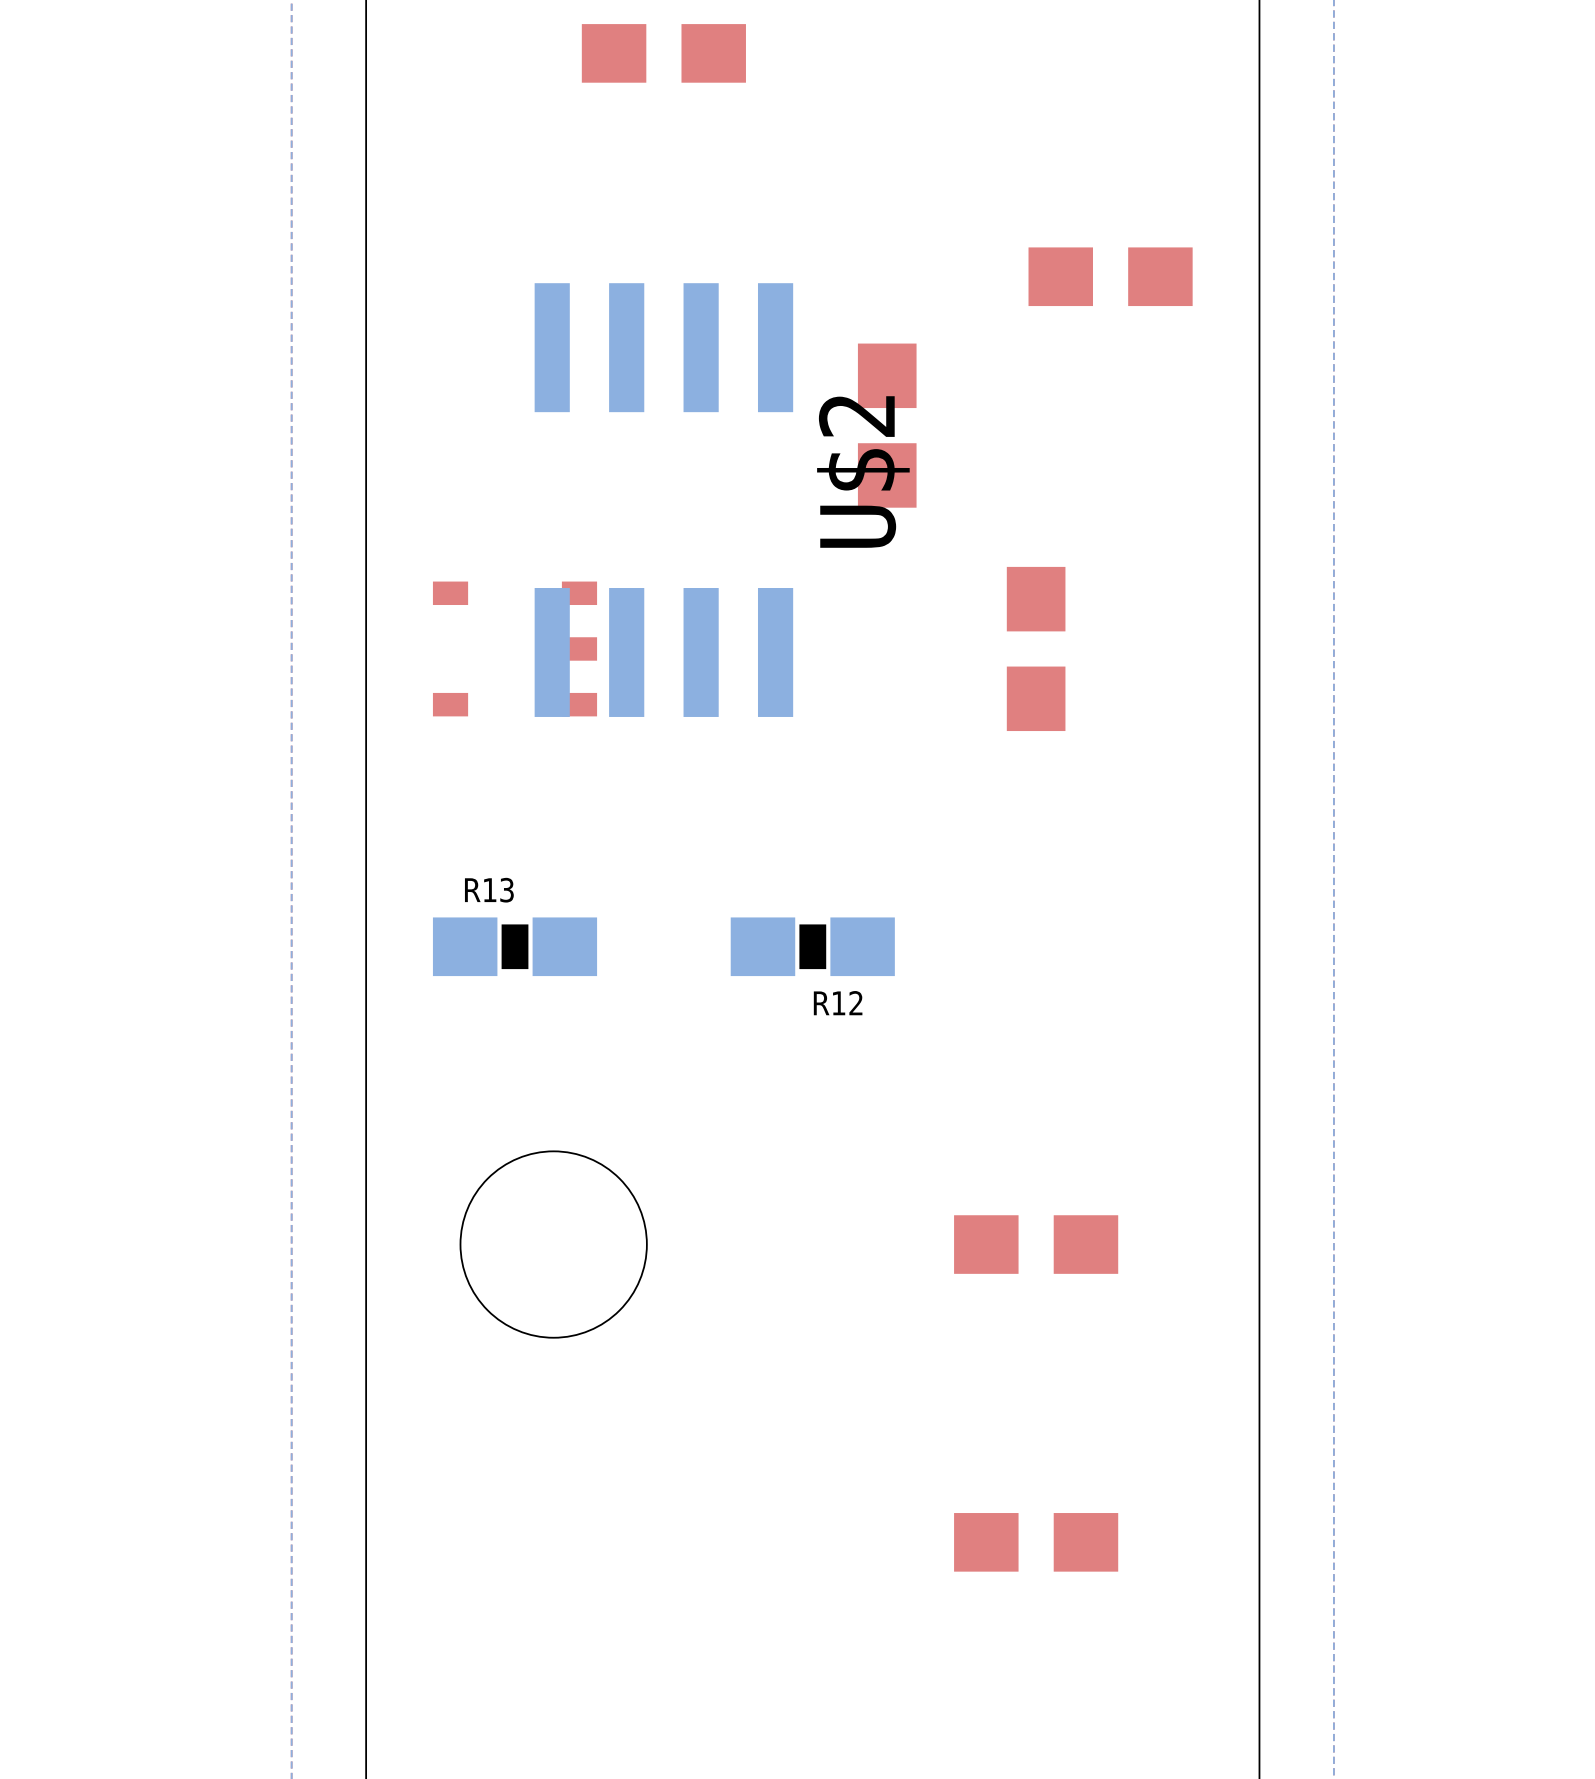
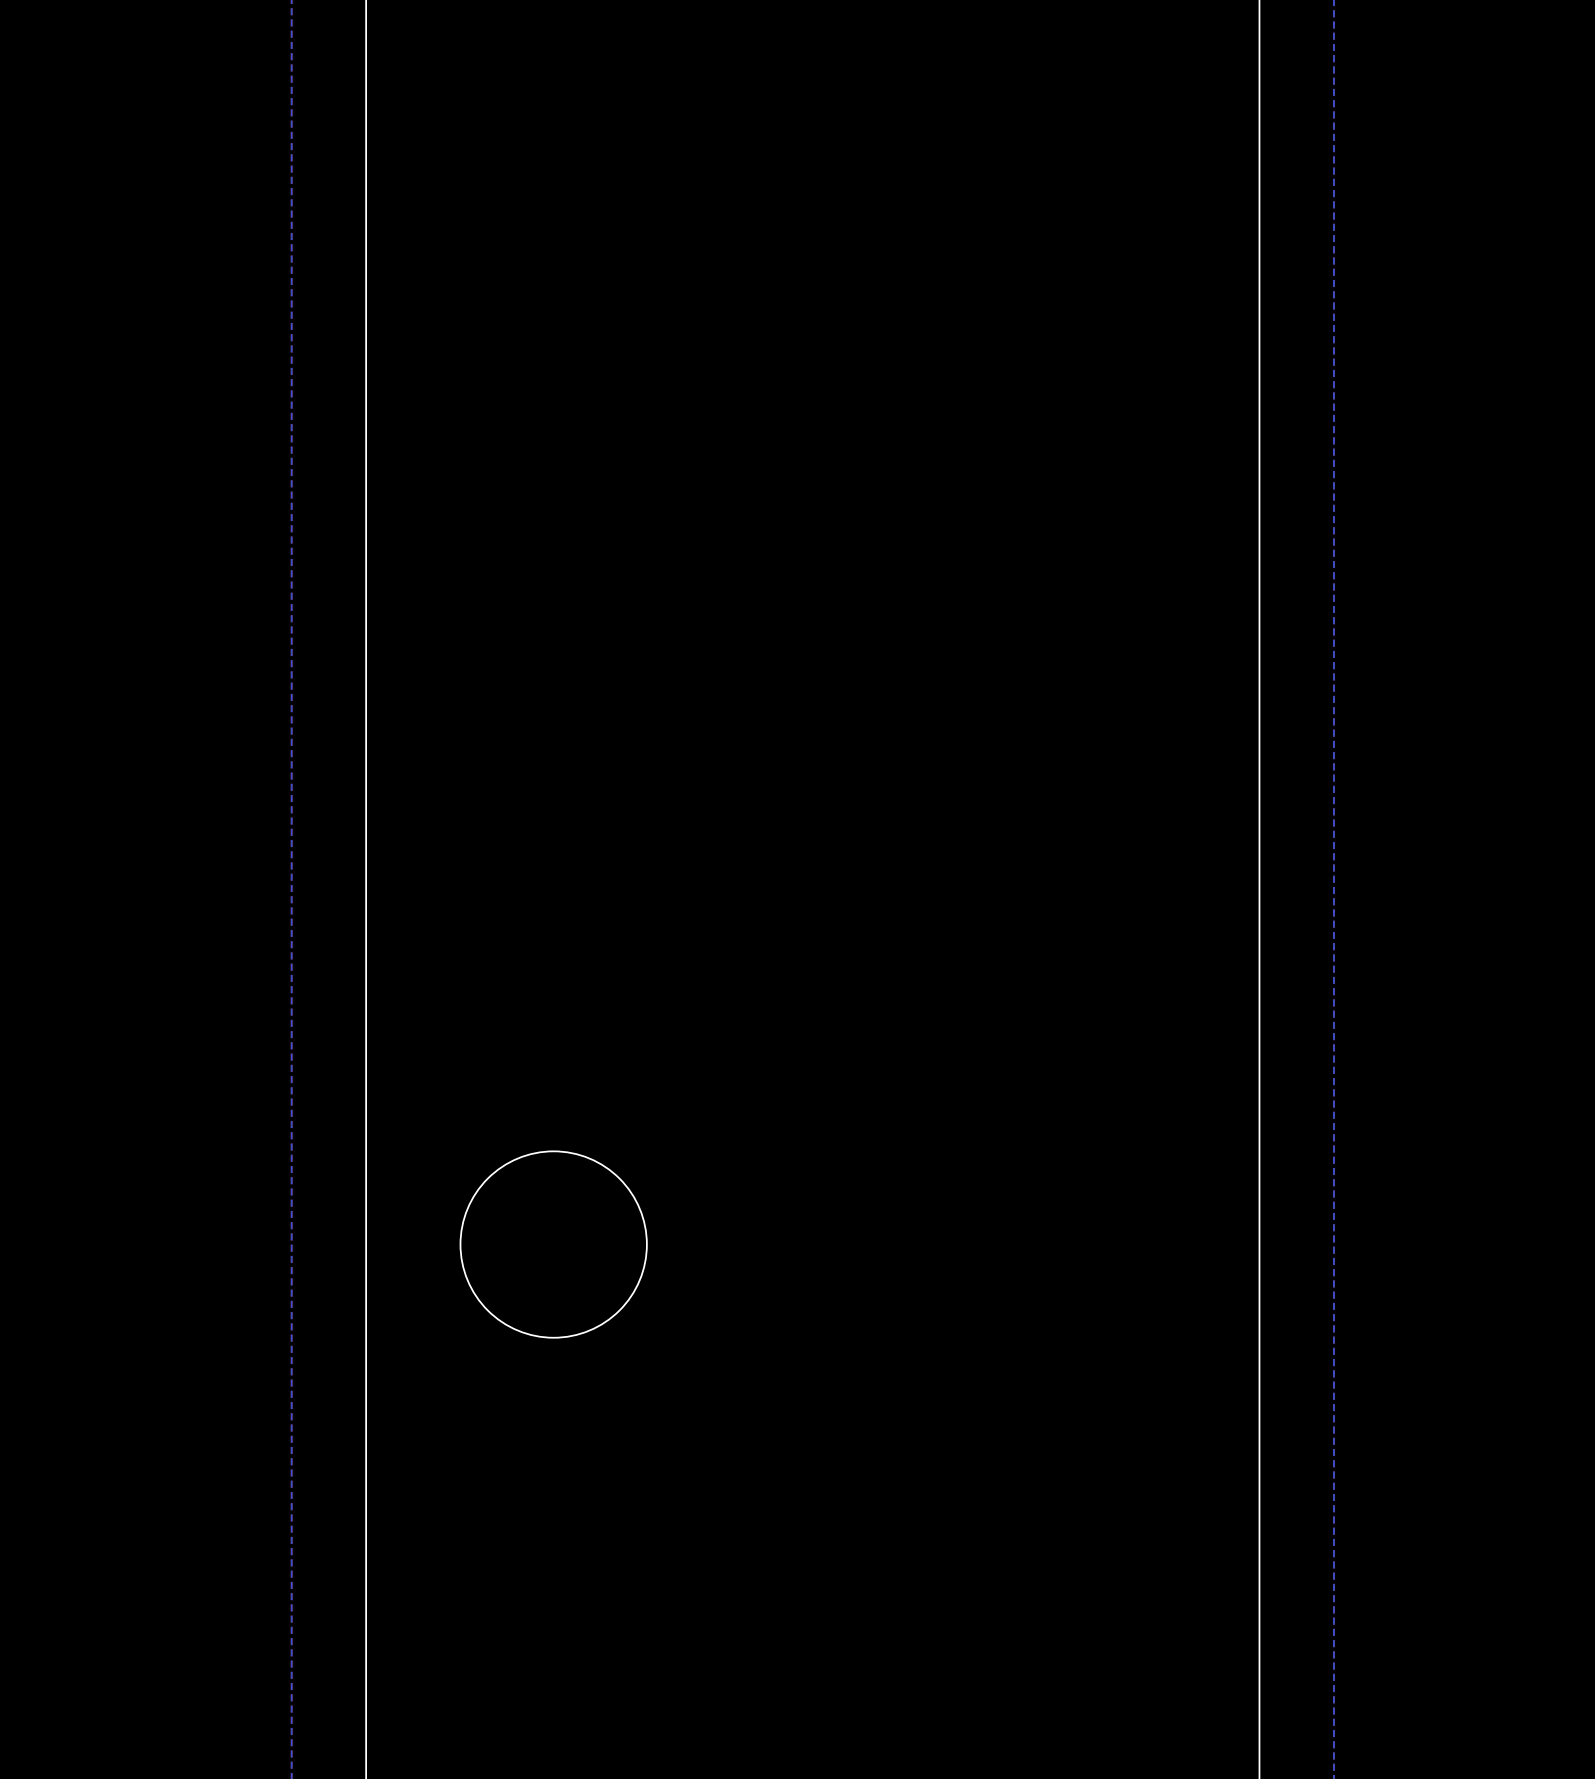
part: (663, 53) -> none
part: (1110, 276) -> none
part: (887, 425) -> none
U$2: (663, 500) -> none
part: (515, 648) -> none
part: (1036, 648) -> none
R13: (515, 946) -> none
R12: (812, 946) -> none
part: (1036, 1244) -> none
part: (1036, 1542) -> none

